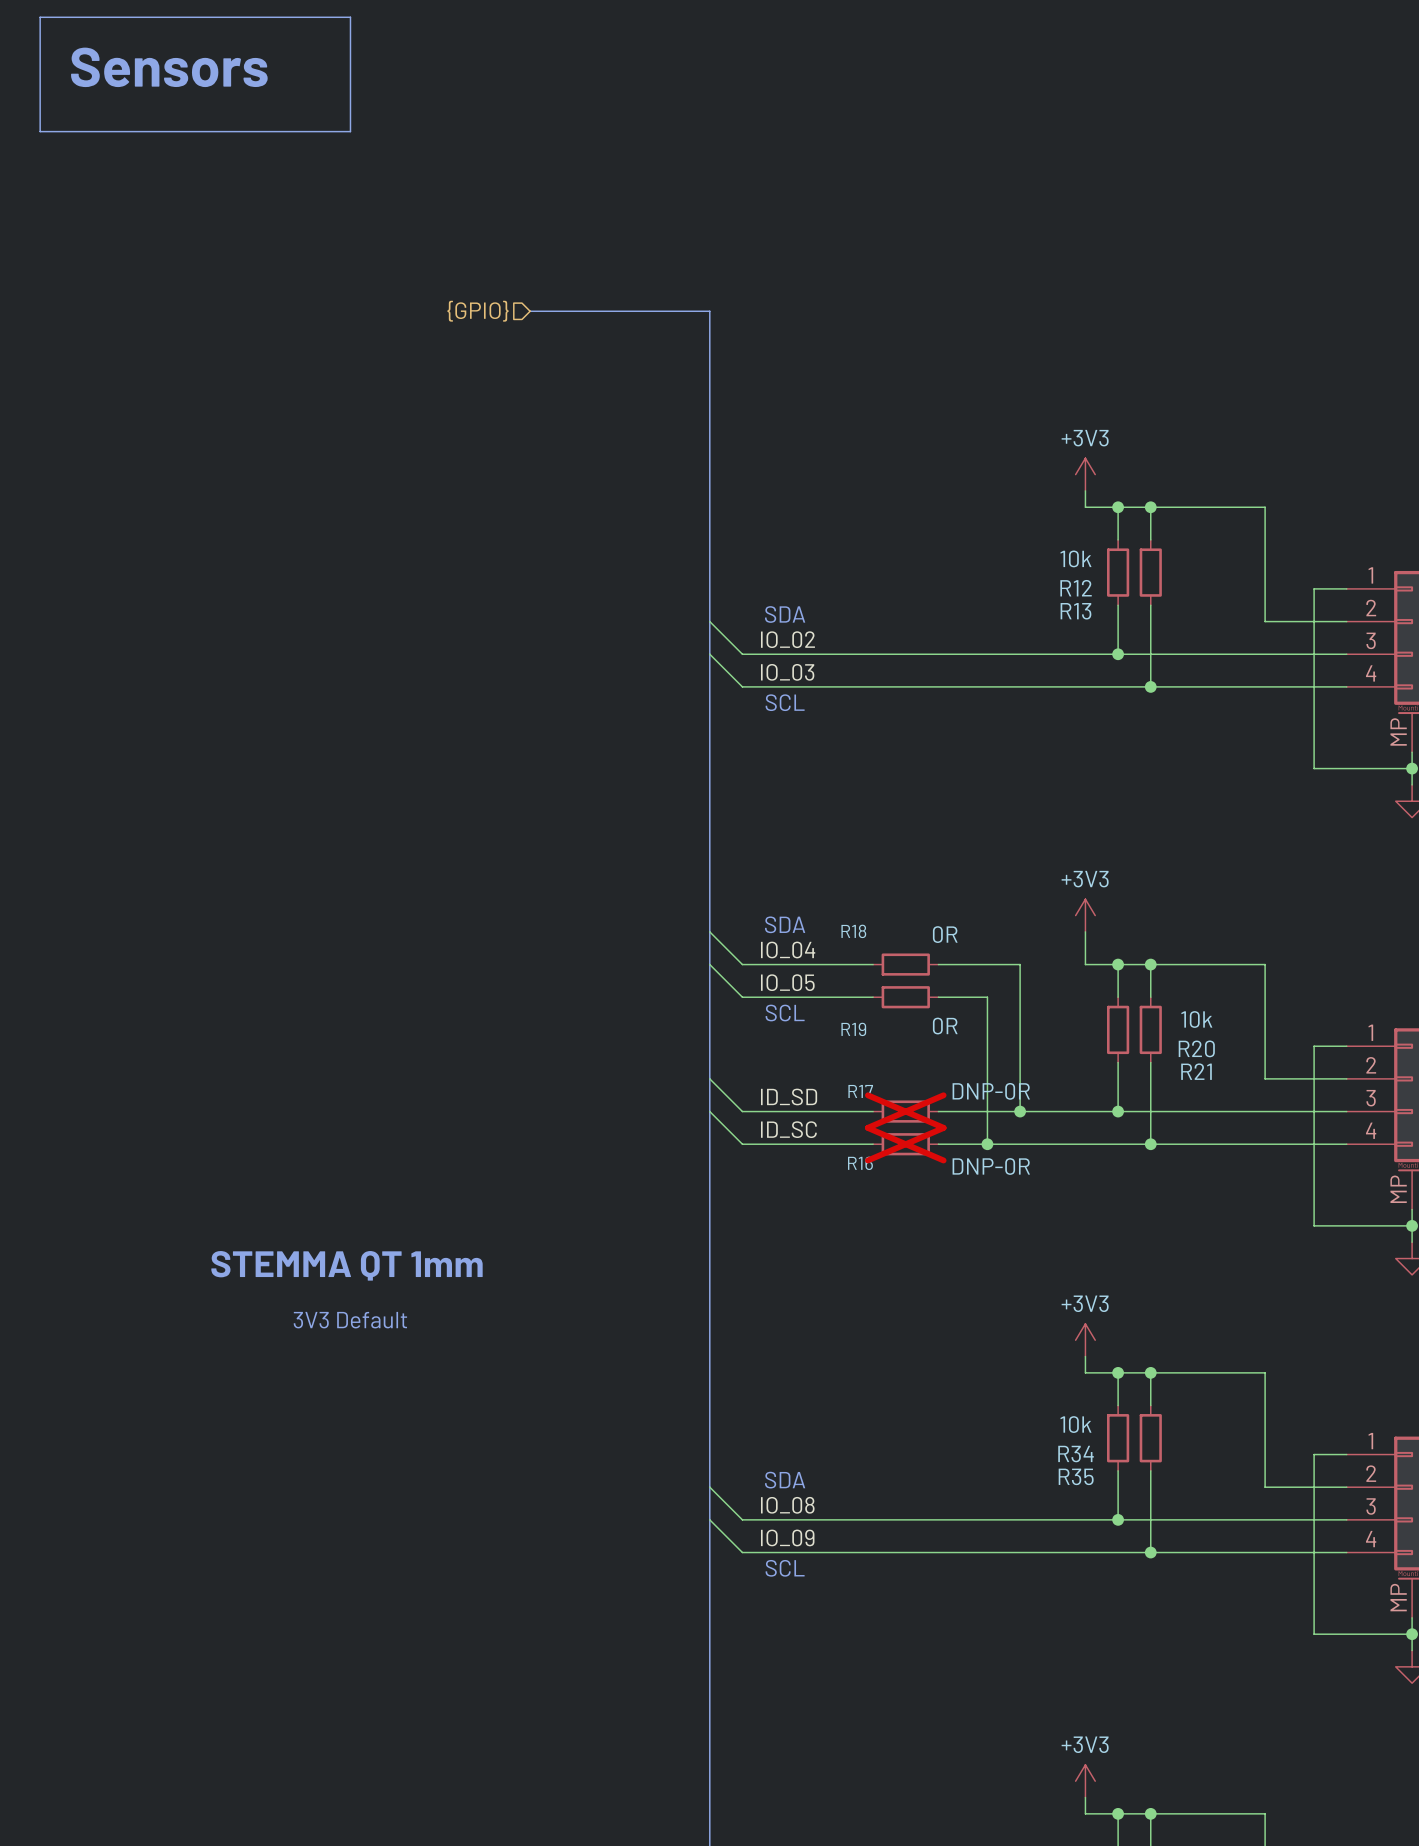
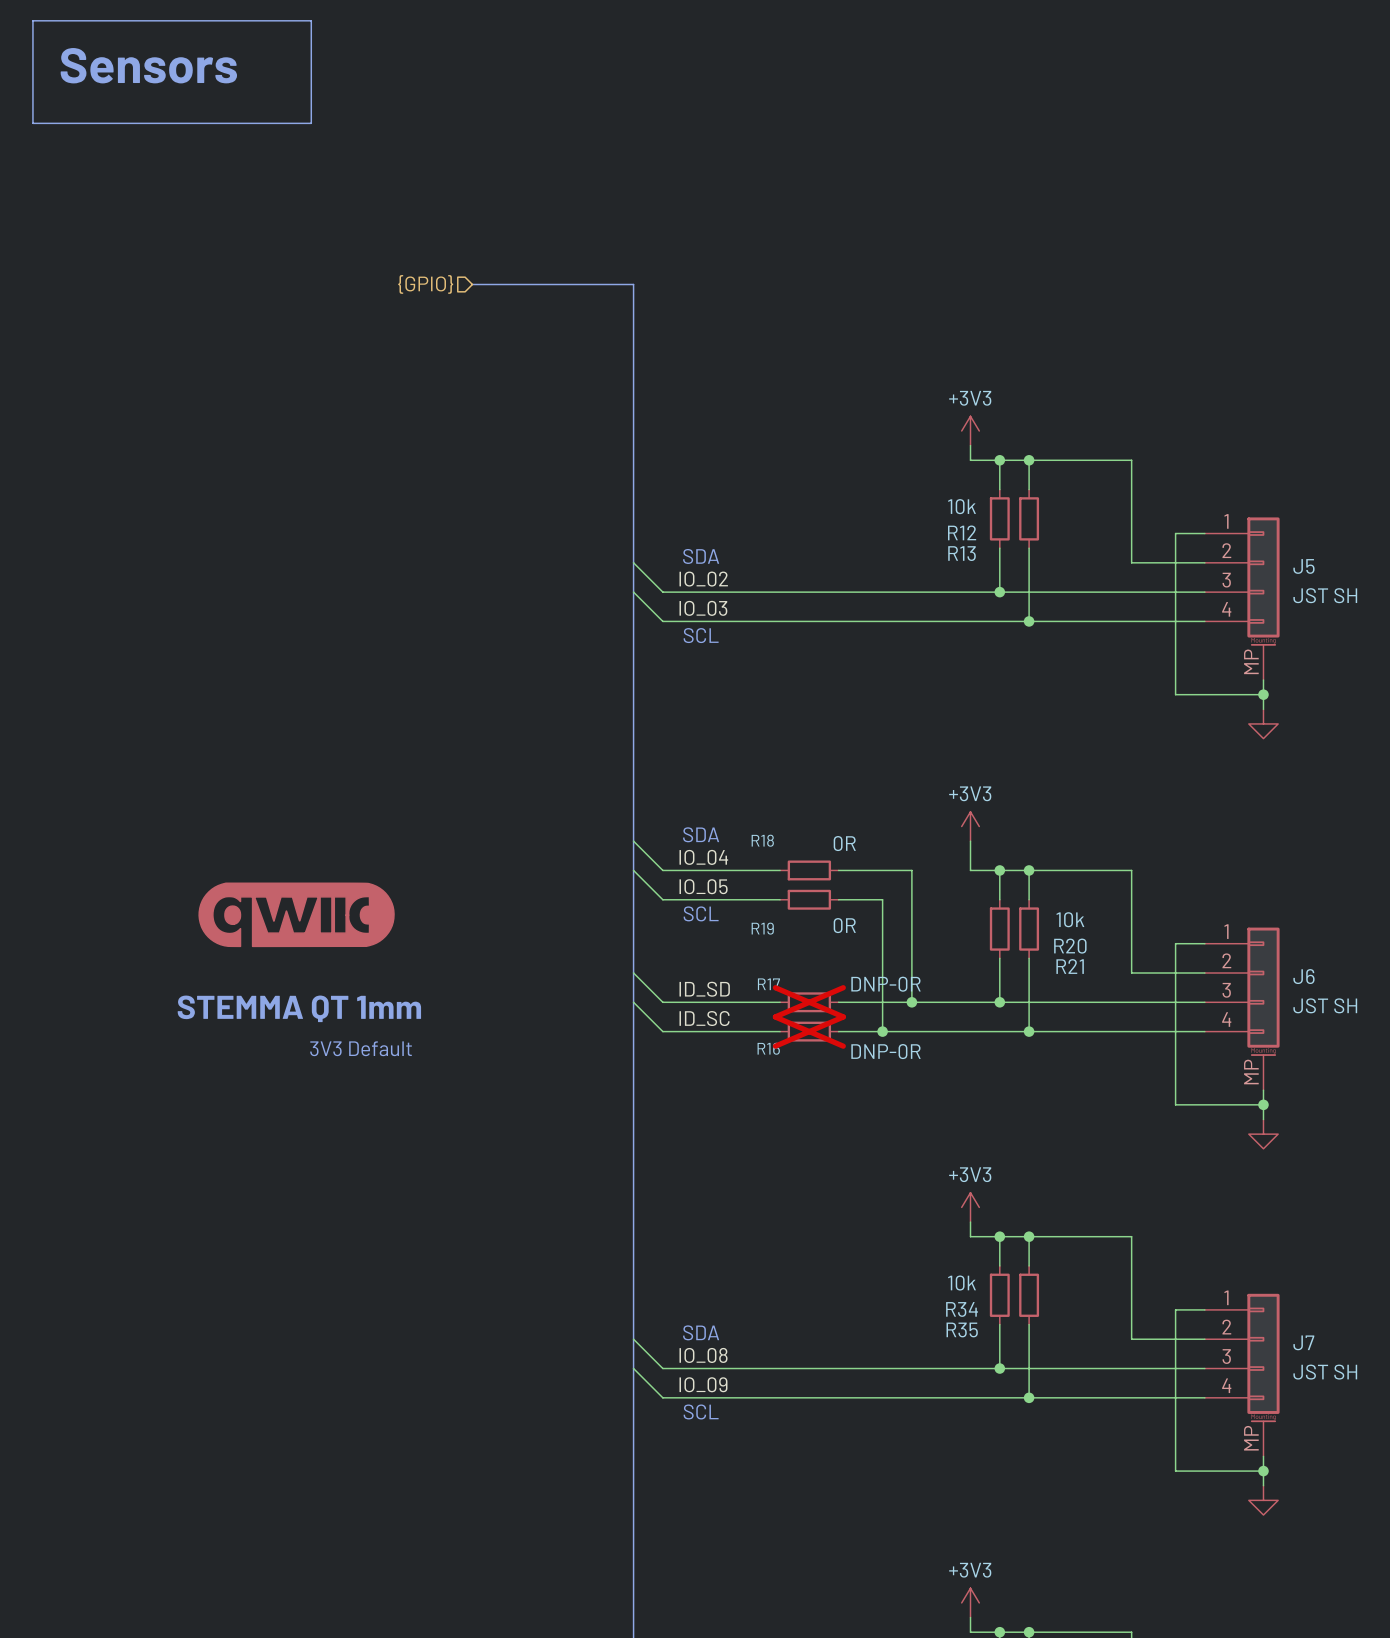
part: none -> (296, 914)
text position: STEMMA QT 1mm (347, 1265) -> STEMMA QT 1mm (299, 1008)
text position: 3V3 Default (350, 1320) -> 3V3 Default (361, 1048)

